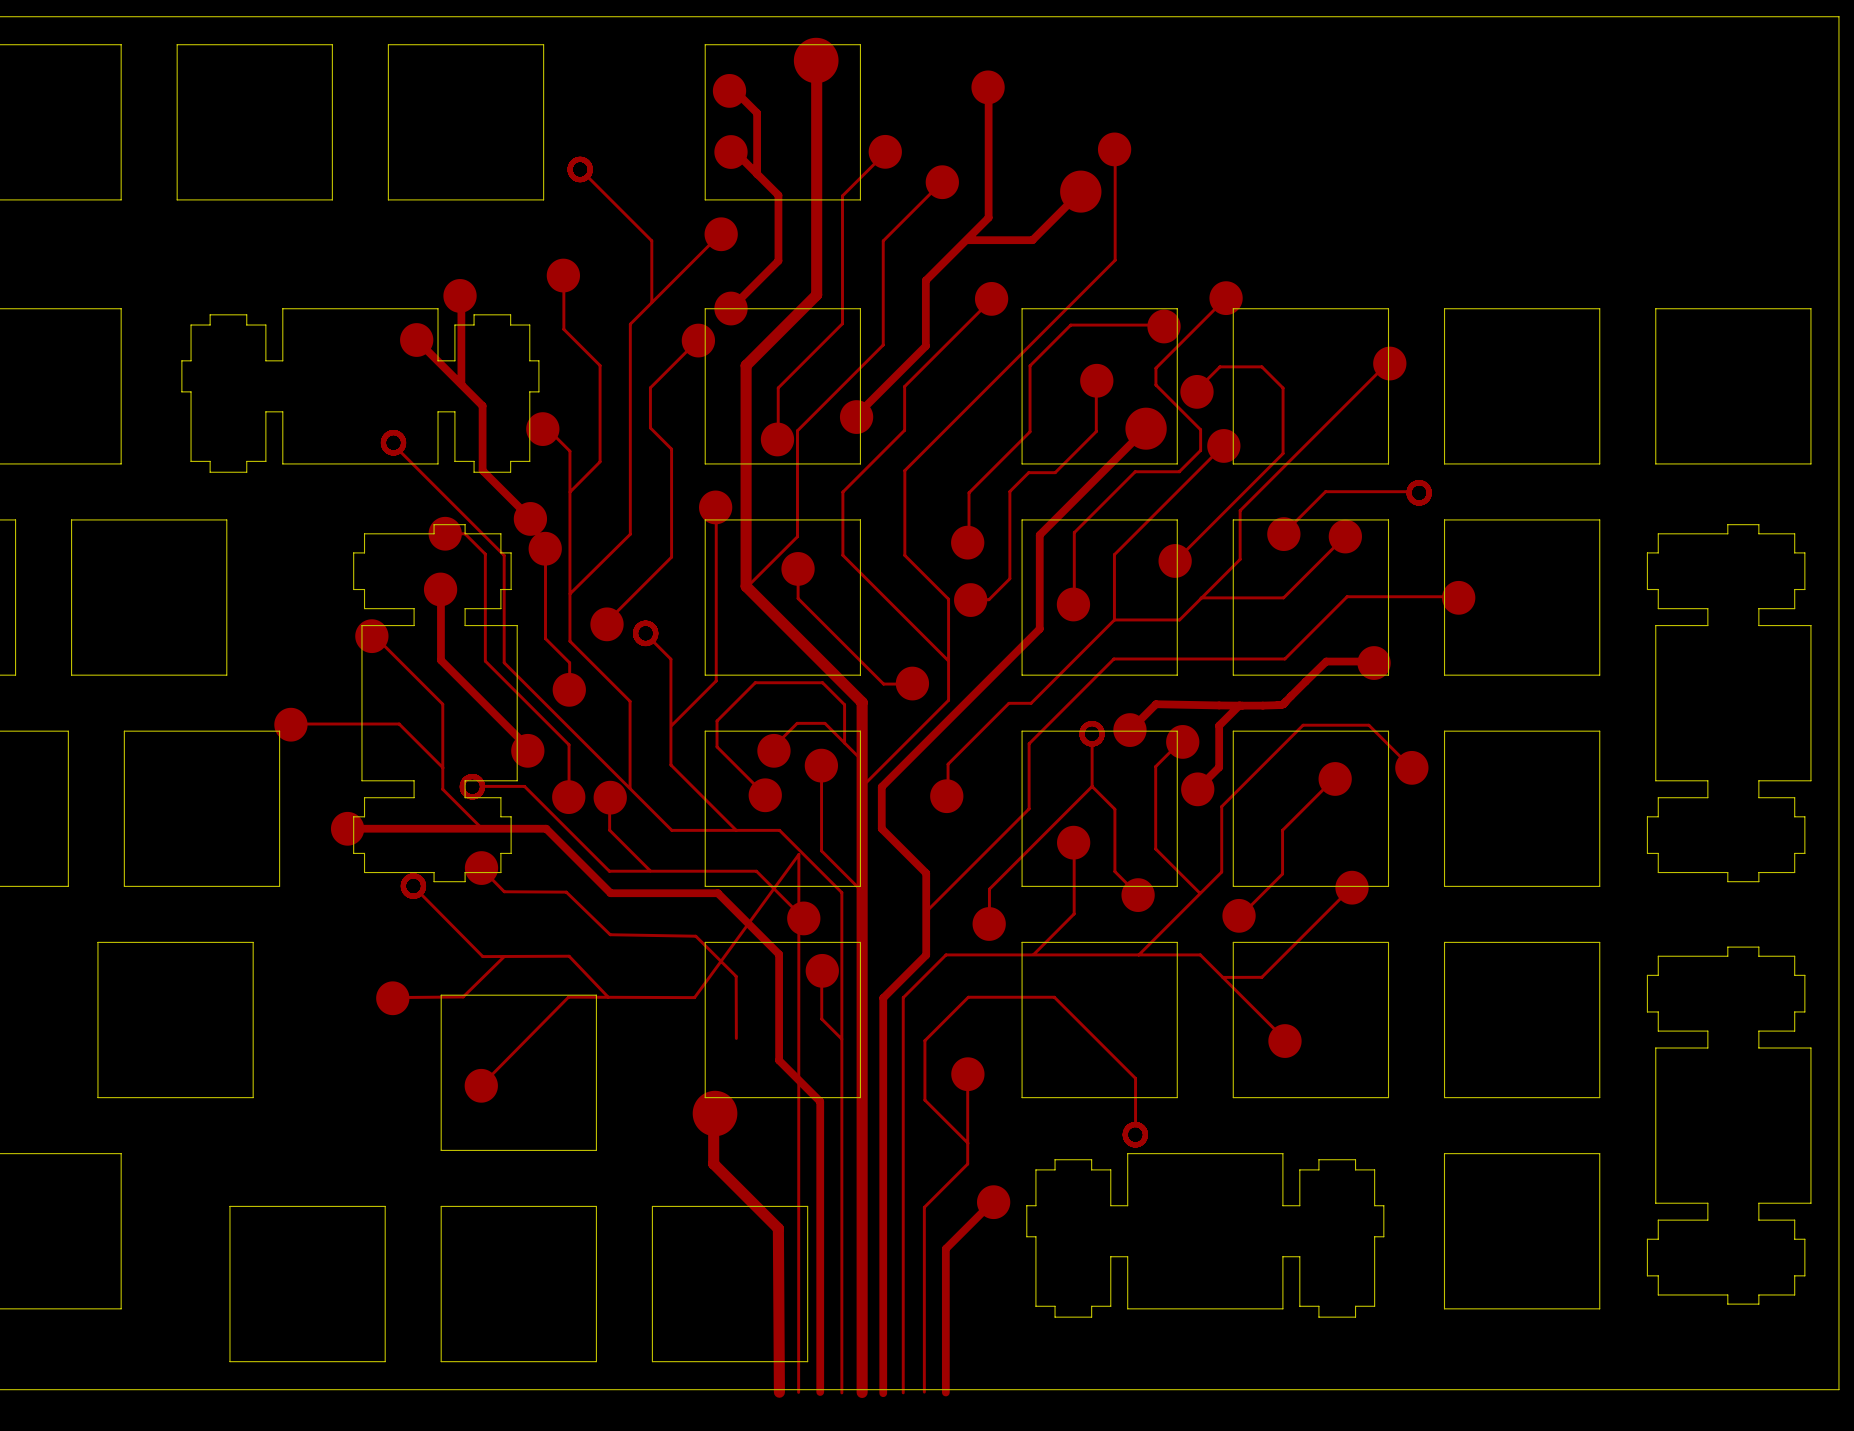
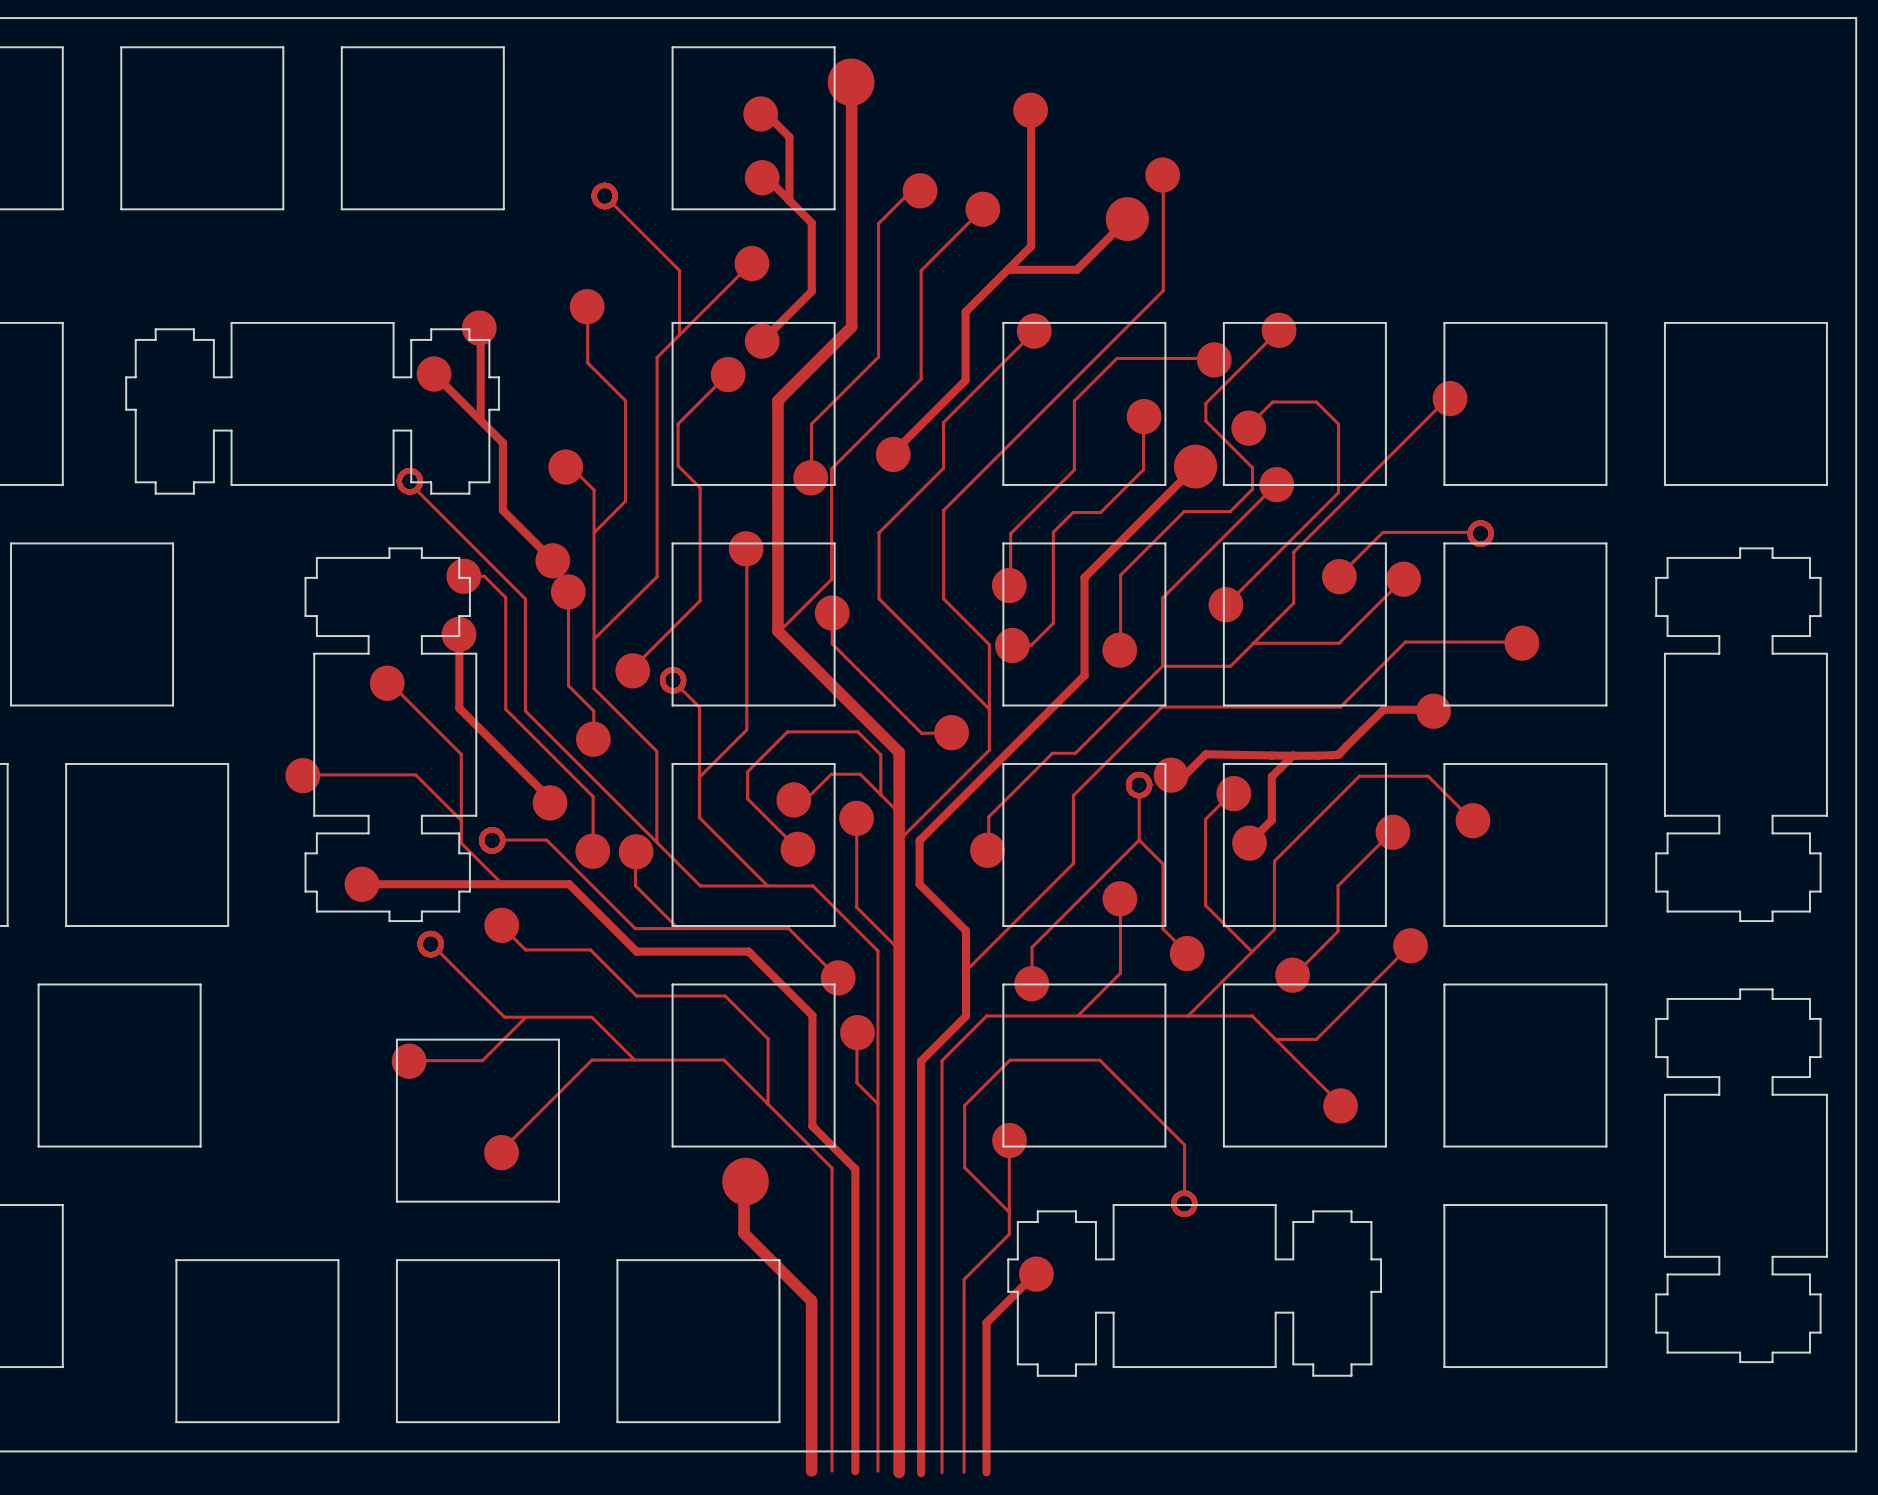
drawing position: (816, 60) -> (851, 82)
drawing: [971, 70, 1005, 105] -> none
drawing: [712, 74, 747, 108] -> none
track: (816, 74) (816, 294) (746, 365) (746, 586) (862, 702) (862, 1392) -> none
drawing: none -> [1013, 92, 1048, 128]
drawing: none -> [743, 96, 779, 132]
track: (736, 92) (757, 113) (757, 174) -> (767, 115) (789, 137) (789, 201)
track: none -> (851, 97) (851, 326) (777, 400) (777, 631) (899, 752) (899, 1472)
track: (988, 94) (988, 217) (925, 280) (925, 346) (859, 412) -> (1031, 117) (1031, 246) (965, 311) (965, 380) (896, 449)
drawing: [1097, 132, 1132, 167] -> none
drawing: [868, 134, 902, 169] -> none
drawing: [714, 135, 748, 169] -> none
drawing: none -> [1145, 157, 1181, 193]
track: (735, 152) (778, 195) (778, 260) (735, 303) -> (767, 178) (811, 222) (811, 291) (767, 336)
drawing: none -> [744, 160, 780, 196]
track: (880, 158) (842, 195) (842, 323) (778, 387) (778, 430) -> (917, 184) (878, 223) (878, 356) (811, 424) (811, 467)
track: (580, 159) (587, 162) (590, 169) (587, 176) (580, 179) (573, 176) (570, 169) (573, 162) (580, 159) -> (603, 185) (611, 187) (615, 194) (612, 202) (605, 206) (598, 204) (594, 197) (596, 189) (603, 185)
track: (1115, 159) (1115, 260) (904, 470) (904, 555) (948, 599) (948, 700) (866, 782) -> (1163, 185) (1163, 290) (943, 510) (943, 598) (989, 644) (989, 750) (903, 835)
track: (588, 177) (651, 240) (651, 302) -> (613, 204) (679, 270) (679, 334)
drawing: none -> [965, 191, 1001, 227]
track: (937, 186) (883, 240) (883, 345) (797, 430) (797, 536) (750, 584) -> (977, 214) (921, 270) (921, 379) (831, 468) (831, 579) (782, 628)
drawing position: (1080, 191) -> (1127, 219)
track: (1072, 199) (1032, 240) (967, 240) -> (1119, 227) (1076, 269) (1009, 269)
drawing: [704, 217, 738, 252] -> none
drawing: none -> [734, 245, 770, 282]
track: (717, 237) (630, 324) (630, 534) (570, 593) -> (747, 266) (657, 357) (657, 576) (594, 639)
drawing: [546, 258, 581, 293] -> none
drawing: none -> [569, 289, 605, 325]
drawing: [443, 279, 477, 313] -> none
track: (563, 281) (563, 329) (600, 365) (600, 461) (570, 492) -> (587, 312) (587, 362) (625, 400) (625, 501) (594, 532)
drawing: [1209, 281, 1243, 316] -> none
drawing: [974, 282, 1009, 316] -> none
drawing: [681, 291, 748, 358] -> none
drawing: none -> [461, 310, 497, 346]
drawing: none -> [1261, 312, 1297, 348]
drawing: none -> [1016, 313, 1052, 349]
track: (461, 302) (461, 384) -> (480, 335) (480, 420)
track: (1220, 304) (1155, 368) (1155, 385) (1200, 429) (1200, 450) (1179, 471) (1135, 471) (1074, 532) (1074, 595) -> (1272, 336) (1205, 403) (1205, 421) (1252, 467) (1252, 489) (1230, 511) (1184, 511) (1120, 575) (1120, 640)
track: (984, 306) (904, 386) (904, 430) (842, 492) (842, 555) (948, 660) -> (1027, 338) (943, 422) (943, 468) (879, 532) (879, 598) (989, 708)
drawing: none -> [710, 323, 780, 393]
drawing: [1147, 309, 1181, 344] -> none
drawing: [400, 323, 434, 357] -> none
track: (1160, 325) (1070, 325) (1030, 365) (1030, 431) (969, 492) (969, 533) -> (1210, 358) (1116, 358) (1074, 400) (1074, 469) (1010, 533) (1010, 576)
drawing: none -> [1196, 342, 1232, 378]
drawing: none -> [416, 356, 452, 392]
track: (421, 344) (482, 405) (482, 470) (525, 513) -> (439, 379) (502, 442) (502, 510) (547, 555)
drawing: [1373, 346, 1407, 381] -> none
track: (691, 347) (650, 387) (650, 427) (671, 449) (671, 557) (612, 616) -> (720, 381) (678, 423) (678, 465) (700, 487) (700, 600) (638, 662)
drawing: [1080, 363, 1114, 398] -> none
drawing: none -> [1432, 380, 1468, 417]
track: (1382, 368) (1240, 510) (1240, 559) (1179, 619) (1114, 619) -> (1442, 403) (1293, 552) (1293, 603) (1230, 666) (1162, 666)
drawing: [1180, 374, 1214, 409] -> none
drawing: none -> [1126, 398, 1162, 435]
track: (1202, 383) (1219, 366) (1261, 366) (1283, 388) (1283, 453) (1179, 556) -> (1254, 419) (1272, 402) (1316, 402) (1338, 424) (1338, 492) (1230, 600)
track: (1096, 386) (1096, 431) (1055, 472) (1028, 472) (1009, 491) (1009, 578) (988, 599) (980, 599) -> (1143, 422) (1143, 469) (1100, 512) (1073, 512) (1053, 532) (1053, 623) (1031, 645) (1022, 645)
drawing: none -> [1231, 410, 1267, 446]
drawing: [839, 400, 874, 434] -> none
drawing: [526, 412, 560, 446] -> none
drawing: none -> [875, 436, 911, 473]
drawing: [760, 422, 795, 457] -> none
drawing position: (1146, 428) -> (1195, 466)
drawing: none -> [548, 449, 584, 485]
drawing: [1207, 429, 1241, 463] -> none
track: (550, 431) (569, 451) (569, 641) (630, 701) (630, 788) -> (573, 469) (594, 490) (594, 688) (656, 751) (656, 842)
track: (392, 432) (386, 435) (383, 443) (386, 450) (394, 452) (400, 449) (403, 442) (400, 435) (392, 432) -> (409, 470) (402, 473) (399, 481) (402, 488) (409, 491) (417, 488) (420, 481) (417, 473) (409, 470)
track: (1139, 435) (1039, 535) (1039, 628) (881, 786) (881, 828) (926, 873) (926, 955) (883, 998) (883, 1393) -> none
drawing: none -> [793, 460, 829, 496]
drawing: none -> [1259, 466, 1295, 503]
track: (400, 451) (504, 555) (504, 662) (671, 830) (779, 830) (841, 892) (841, 1392) -> none
track: (1217, 451) (1114, 554) (1114, 619) -> (1270, 490) (1162, 598) (1162, 666)
track: none -> (1188, 473) (1084, 577) (1084, 675) (919, 840) (919, 884) (966, 930) (966, 1016) (921, 1061) (921, 1473)
track: none -> (417, 490) (525, 598) (525, 710) (700, 885) (812, 885) (877, 950) (877, 1471)
track: (1418, 482) (1425, 485) (1429, 491) (1426, 499) (1420, 502) (1412, 500) (1409, 493) (1411, 486) (1418, 482) -> (1479, 523) (1487, 525) (1491, 532) (1488, 540) (1481, 544) (1473, 541) (1470, 534) (1472, 526) (1479, 523)
drawing: [699, 490, 733, 525] -> none
track: (1409, 491) (1325, 491) (1289, 527) -> (1470, 532) (1382, 532) (1345, 569)
drawing: [513, 502, 562, 566] -> none
drawing: none -> [728, 531, 764, 567]
drawing: [428, 516, 462, 551] -> none
track: (716, 517) (716, 680) (671, 725) -> (746, 559) (746, 729) (700, 776)
drawing: [1267, 517, 1301, 551] -> none
drawing: none -> [535, 543, 586, 610]
drawing: [951, 525, 985, 560] -> none
track: (451, 533) (464, 533) (485, 554) (485, 661) (569, 744) (569, 789) -> (470, 576) (484, 576) (505, 597) (505, 709) (593, 796) (593, 843)
drawing: none -> [446, 558, 482, 594]
drawing position: (1345, 536) -> (1339, 576)
drawing: none -> [1386, 561, 1421, 597]
track: (1339, 542) (1283, 597) (1201, 597) -> (1397, 584) (1339, 643) (1252, 643)
drawing: none -> [991, 567, 1027, 604]
drawing: [1158, 544, 1192, 578] -> none
drawing: [781, 552, 815, 586] -> none
track: (545, 555) (545, 638) (569, 662) (569, 683) -> (568, 599) (568, 685) (593, 711) (593, 732)
drawing: none -> [1208, 587, 1244, 623]
drawing: none -> [814, 595, 850, 631]
drawing: [423, 572, 458, 607] -> none
track: (798, 579) (798, 598) (883, 684) (903, 684) -> (832, 623) (832, 643) (921, 733) (941, 733)
drawing: [1442, 580, 1476, 615] -> none
drawing: [954, 583, 988, 617] -> none
drawing: [1056, 587, 1091, 622] -> none
drawing: none -> [441, 616, 477, 653]
track: (440, 595) (440, 660) (525, 744) -> (459, 640) (459, 708) (547, 796)
track: (1453, 596) (1347, 596) (1284, 658) (1113, 658) (1029, 743) (1029, 808) (928, 909) -> (1516, 642) (1405, 642) (1340, 707) (1161, 707) (1073, 795) (1073, 863) (968, 968)
drawing: none -> [1504, 625, 1540, 661]
drawing: none -> [995, 627, 1030, 664]
drawing: none -> [1102, 632, 1138, 668]
drawing: [590, 607, 624, 642] -> none
drawing: [355, 619, 389, 654] -> none
track: (1114, 619) (1031, 703) (1008, 703) (948, 764) (948, 787) -> (1162, 666) (1075, 753) (1052, 753) (988, 816) (988, 840)
track: (645, 623) (652, 625) (655, 632) (653, 640) (646, 643) (638, 640) (635, 633) (638, 626) (645, 623) -> (673, 669) (680, 672) (683, 680) (680, 687) (673, 690) (665, 687) (662, 680) (665, 672) (673, 669)
drawing: none -> [615, 653, 651, 689]
drawing: none -> [369, 665, 405, 701]
track: (379, 640) (442, 704) (442, 789) (480, 827) -> (394, 687) (461, 754) (461, 843) (500, 882)
track: (652, 640) (670, 659) (670, 765) (736, 830) -> (680, 688) (699, 707) (699, 817) (767, 885)
drawing: [1357, 646, 1391, 680] -> none
track: (1366, 661) (1326, 661) (1281, 704) (1156, 704) (1134, 725) -> (1425, 709) (1383, 709) (1337, 754) (1205, 754) (1183, 776)
drawing: none -> [1416, 693, 1451, 729]
drawing: [895, 666, 930, 701] -> none
drawing: [552, 672, 586, 707] -> none
drawing: none -> [934, 715, 969, 751]
drawing: none -> [576, 721, 611, 757]
track: (1239, 705) (1219, 725) (1219, 767) (1203, 782) -> (1293, 755) (1271, 776) (1271, 820) (1255, 836)
drawing: [274, 707, 308, 742] -> none
drawing: [1113, 713, 1147, 747] -> none
track: (1090, 723) (1084, 727) (1082, 734) (1085, 741) (1093, 743) (1099, 740) (1102, 732) (1098, 725) (1090, 723) -> (1138, 774) (1131, 777) (1128, 785) (1132, 792) (1139, 795) (1146, 792) (1149, 784) (1146, 777) (1138, 774)
track: (298, 724) (399, 724) (443, 767) -> (310, 774) (415, 774) (461, 820)
drawing: none -> [285, 758, 321, 794]
drawing: [511, 733, 545, 768] -> none
drawing: [748, 733, 791, 813] -> none
drawing: none -> [1216, 775, 1252, 812]
track: (777, 743) (797, 723) (824, 723) (862, 760) -> (810, 795) (831, 774) (860, 774) (899, 813)
track: (844, 743) (844, 704) (822, 682) (755, 682) (717, 720) (717, 746) (761, 790) -> (880, 794) (880, 754) (857, 731) (787, 731) (747, 771) (747, 798) (793, 844)
track: (1178, 744) (1155, 766) (1155, 848) (1199, 893) -> (1229, 795) (1205, 819) (1205, 905) (1251, 951)
track: (1092, 745) (1092, 786) -> (1139, 797) (1139, 840)
drawing: [1395, 750, 1429, 785] -> none
drawing: none -> [532, 785, 568, 821]
drawing: [1318, 762, 1352, 796] -> none
track: (1407, 763) (1368, 725) (1303, 725) (1221, 806) (1221, 872) (1138, 954) -> (1468, 816) (1428, 776) (1359, 776) (1274, 861) (1274, 929) (1187, 1015)
drawing: none -> [839, 800, 874, 836]
drawing: none -> [1455, 803, 1491, 839]
track: (821, 772) (821, 850) (860, 889) -> (856, 825) (856, 907) (896, 947)
drawing: [1181, 772, 1215, 807] -> none
track: (471, 776) (464, 779) (462, 787) (465, 794) (472, 796) (479, 793) (482, 786) (479, 779) (471, 776) -> (491, 829) (484, 833) (481, 841) (485, 848) (493, 850) (500, 847) (502, 839) (498, 832) (491, 829)
drawing: [930, 779, 964, 814] -> none
drawing: none -> [1375, 814, 1411, 850]
drawing: [552, 780, 627, 815] -> none
track: (1329, 782) (1282, 830) (1282, 873) (1244, 911) -> (1387, 836) (1338, 885) (1338, 931) (1298, 970)
track: (484, 786) (524, 786) (609, 871) (756, 871) (796, 911) -> (505, 840) (546, 840) (635, 928) (788, 928) (831, 970)
track: (1092, 786) (1114, 809) (1114, 871) (1131, 888) -> (1139, 840) (1163, 863) (1163, 929) (1180, 946)
track: (1092, 786) (989, 889) (989, 914) -> (1139, 840) (1032, 947) (1032, 973)
drawing: none -> [1232, 825, 1267, 861]
drawing: none -> [780, 831, 816, 867]
drawing: none -> [970, 832, 1005, 868]
drawing: none -> [575, 833, 654, 870]
track: (609, 806) (609, 830) (650, 870) -> (635, 860) (635, 885) (677, 928)
drawing: [330, 811, 365, 846] -> none
drawing: [1057, 825, 1091, 860] -> none
track: (356, 828) (546, 828) (610, 893) (717, 893) (779, 954) (779, 1060) (820, 1101) (820, 1392) -> none
drawing: none -> [344, 866, 380, 902]
drawing: none -> [1102, 881, 1138, 917]
track: none -> (371, 884) (569, 884) (636, 951) (748, 951) (812, 1015) (812, 1126) (855, 1169) (855, 1471)
drawing: [464, 851, 499, 885] -> none
track: (1074, 851) (1074, 913) (1033, 954) -> (1120, 908) (1120, 973) (1078, 1015)
drawing: none -> [484, 907, 520, 943]
drawing: [1335, 870, 1369, 905] -> none
track: (486, 873) (504, 891) (566, 892) (610, 934) (695, 936) (736, 976) (736, 1038) -> none
track: (412, 875) (405, 879) (403, 886) (406, 893) (413, 896) (420, 892) (423, 885) (420, 878) (412, 875) -> (429, 933) (422, 937) (420, 945) (423, 952) (431, 954) (438, 950) (441, 943) (437, 935) (429, 933)
drawing: [1121, 878, 1155, 912] -> none
drawing: none -> [1393, 928, 1428, 964]
track: none -> (508, 933) (525, 949) (590, 949) (636, 995) (725, 995) (768, 1038) (768, 1104)
track: (1346, 893) (1261, 977) (1222, 977) -> (1404, 951) (1316, 1039) (1275, 1039)
track: (421, 894) (482, 956) (569, 956) (608, 997) -> none
drawing: none -> [1169, 935, 1205, 972]
drawing: [1222, 898, 1256, 933] -> none
drawing: [787, 901, 821, 936] -> none
drawing: [972, 907, 1006, 941] -> none
track: none -> (440, 952) (504, 1017) (591, 1017) (634, 1059)
drawing: none -> [1275, 957, 1310, 993]
drawing: none -> [820, 960, 856, 996]
drawing: none -> [1014, 966, 1050, 1002]
drawing: [805, 953, 839, 988] -> none
track: (504, 956) (463, 996) (401, 997) -> none
drawing: none -> [840, 1015, 875, 1051]
track: none -> (525, 1017) (482, 1060) (417, 1060)
track: (821, 979) (821, 1019) (841, 1039) -> (856, 1041) (856, 1082) (877, 1103)
drawing: [376, 981, 410, 1016] -> none
drawing: none -> [391, 1043, 427, 1079]
drawing: [1268, 1024, 1302, 1058] -> none
track: (1281, 1036) (1200, 954) (946, 954) (903, 997) (903, 1392) -> none
drawing: none -> [1323, 1088, 1358, 1124]
track: none -> (1337, 1100) (1252, 1015) (986, 1015) (942, 1060) (942, 1472)
drawing: [951, 1057, 985, 1092] -> none
drawing: [464, 1068, 498, 1103] -> none
drawing: none -> [992, 1122, 1027, 1159]
track: (486, 1080) (568, 997) (694, 997) (798, 854) (798, 1392) -> none
track: (967, 1083) (967, 1164) (924, 1207) (924, 1392) -> none
drawing: none -> [484, 1134, 519, 1171]
track: none -> (507, 1144) (591, 1060) (723, 1060) (832, 1168) (832, 1471)
track: none -> (1009, 1150) (1009, 1234) (964, 1279) (964, 1472)
drawing position: (715, 1113) -> (745, 1181)
track: (1134, 1124) (1127, 1128) (1125, 1135) (1128, 1142) (1136, 1144) (1143, 1141) (1145, 1133) (1141, 1126) (1134, 1124) -> (1183, 1193) (1176, 1196) (1173, 1204) (1177, 1211) (1185, 1214) (1192, 1210) (1194, 1202) (1191, 1195) (1183, 1193)
track: (713, 1125) (713, 1163) (778, 1228) (779, 1392) -> none
track: (1135, 1126) (1135, 1078) (1054, 997) (968, 997) (924, 1040) (924, 1100) (968, 1143) -> (1184, 1194) (1184, 1144) (1099, 1060) (1009, 1060) (964, 1105) (964, 1167) (1009, 1212)
track: none -> (744, 1193) (744, 1233) (811, 1300) (811, 1470)
drawing: [977, 1185, 1011, 1220] -> none
drawing: none -> [1019, 1256, 1054, 1292]
track: (986, 1207) (945, 1248) (945, 1392) -> none
track: none -> (1029, 1279) (986, 1322) (986, 1472)

